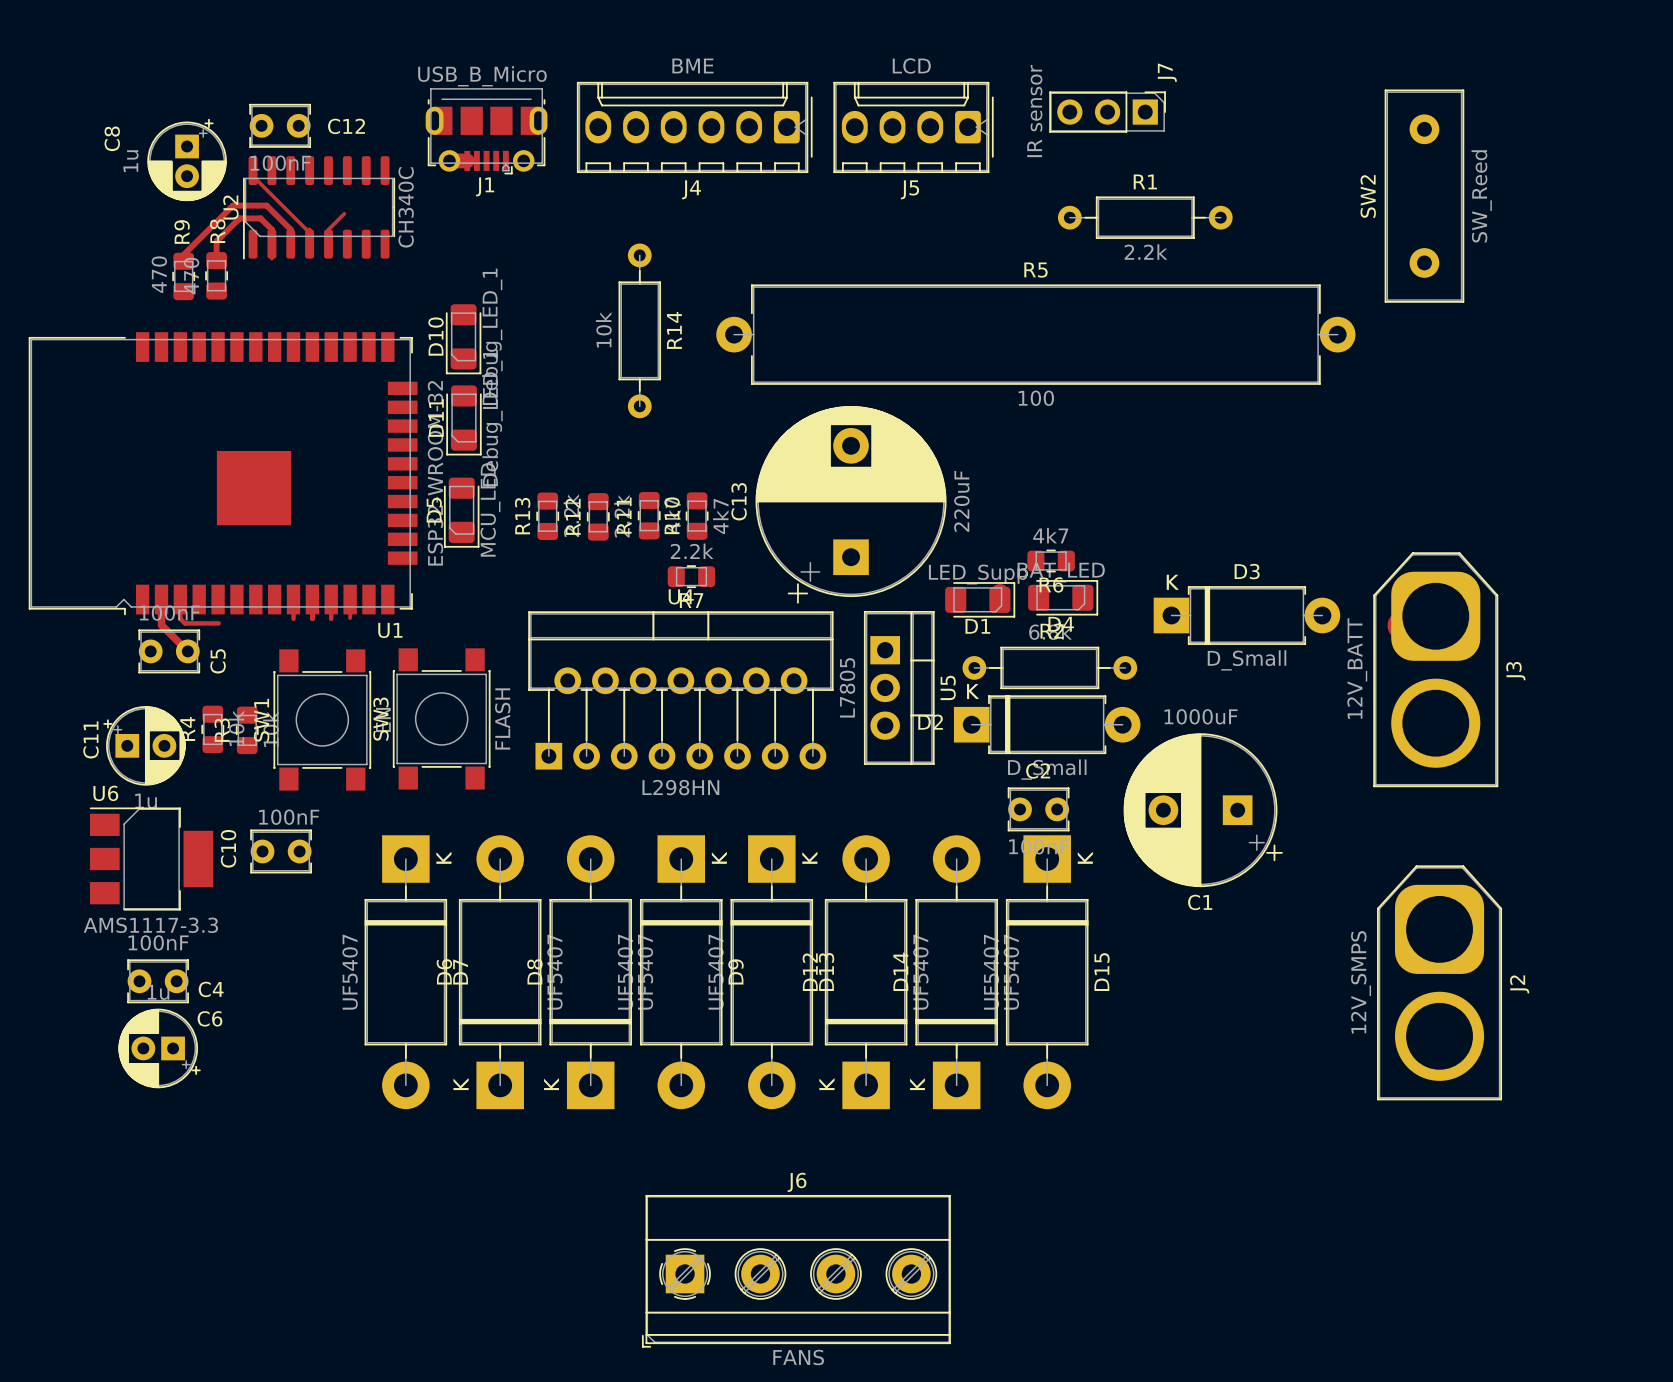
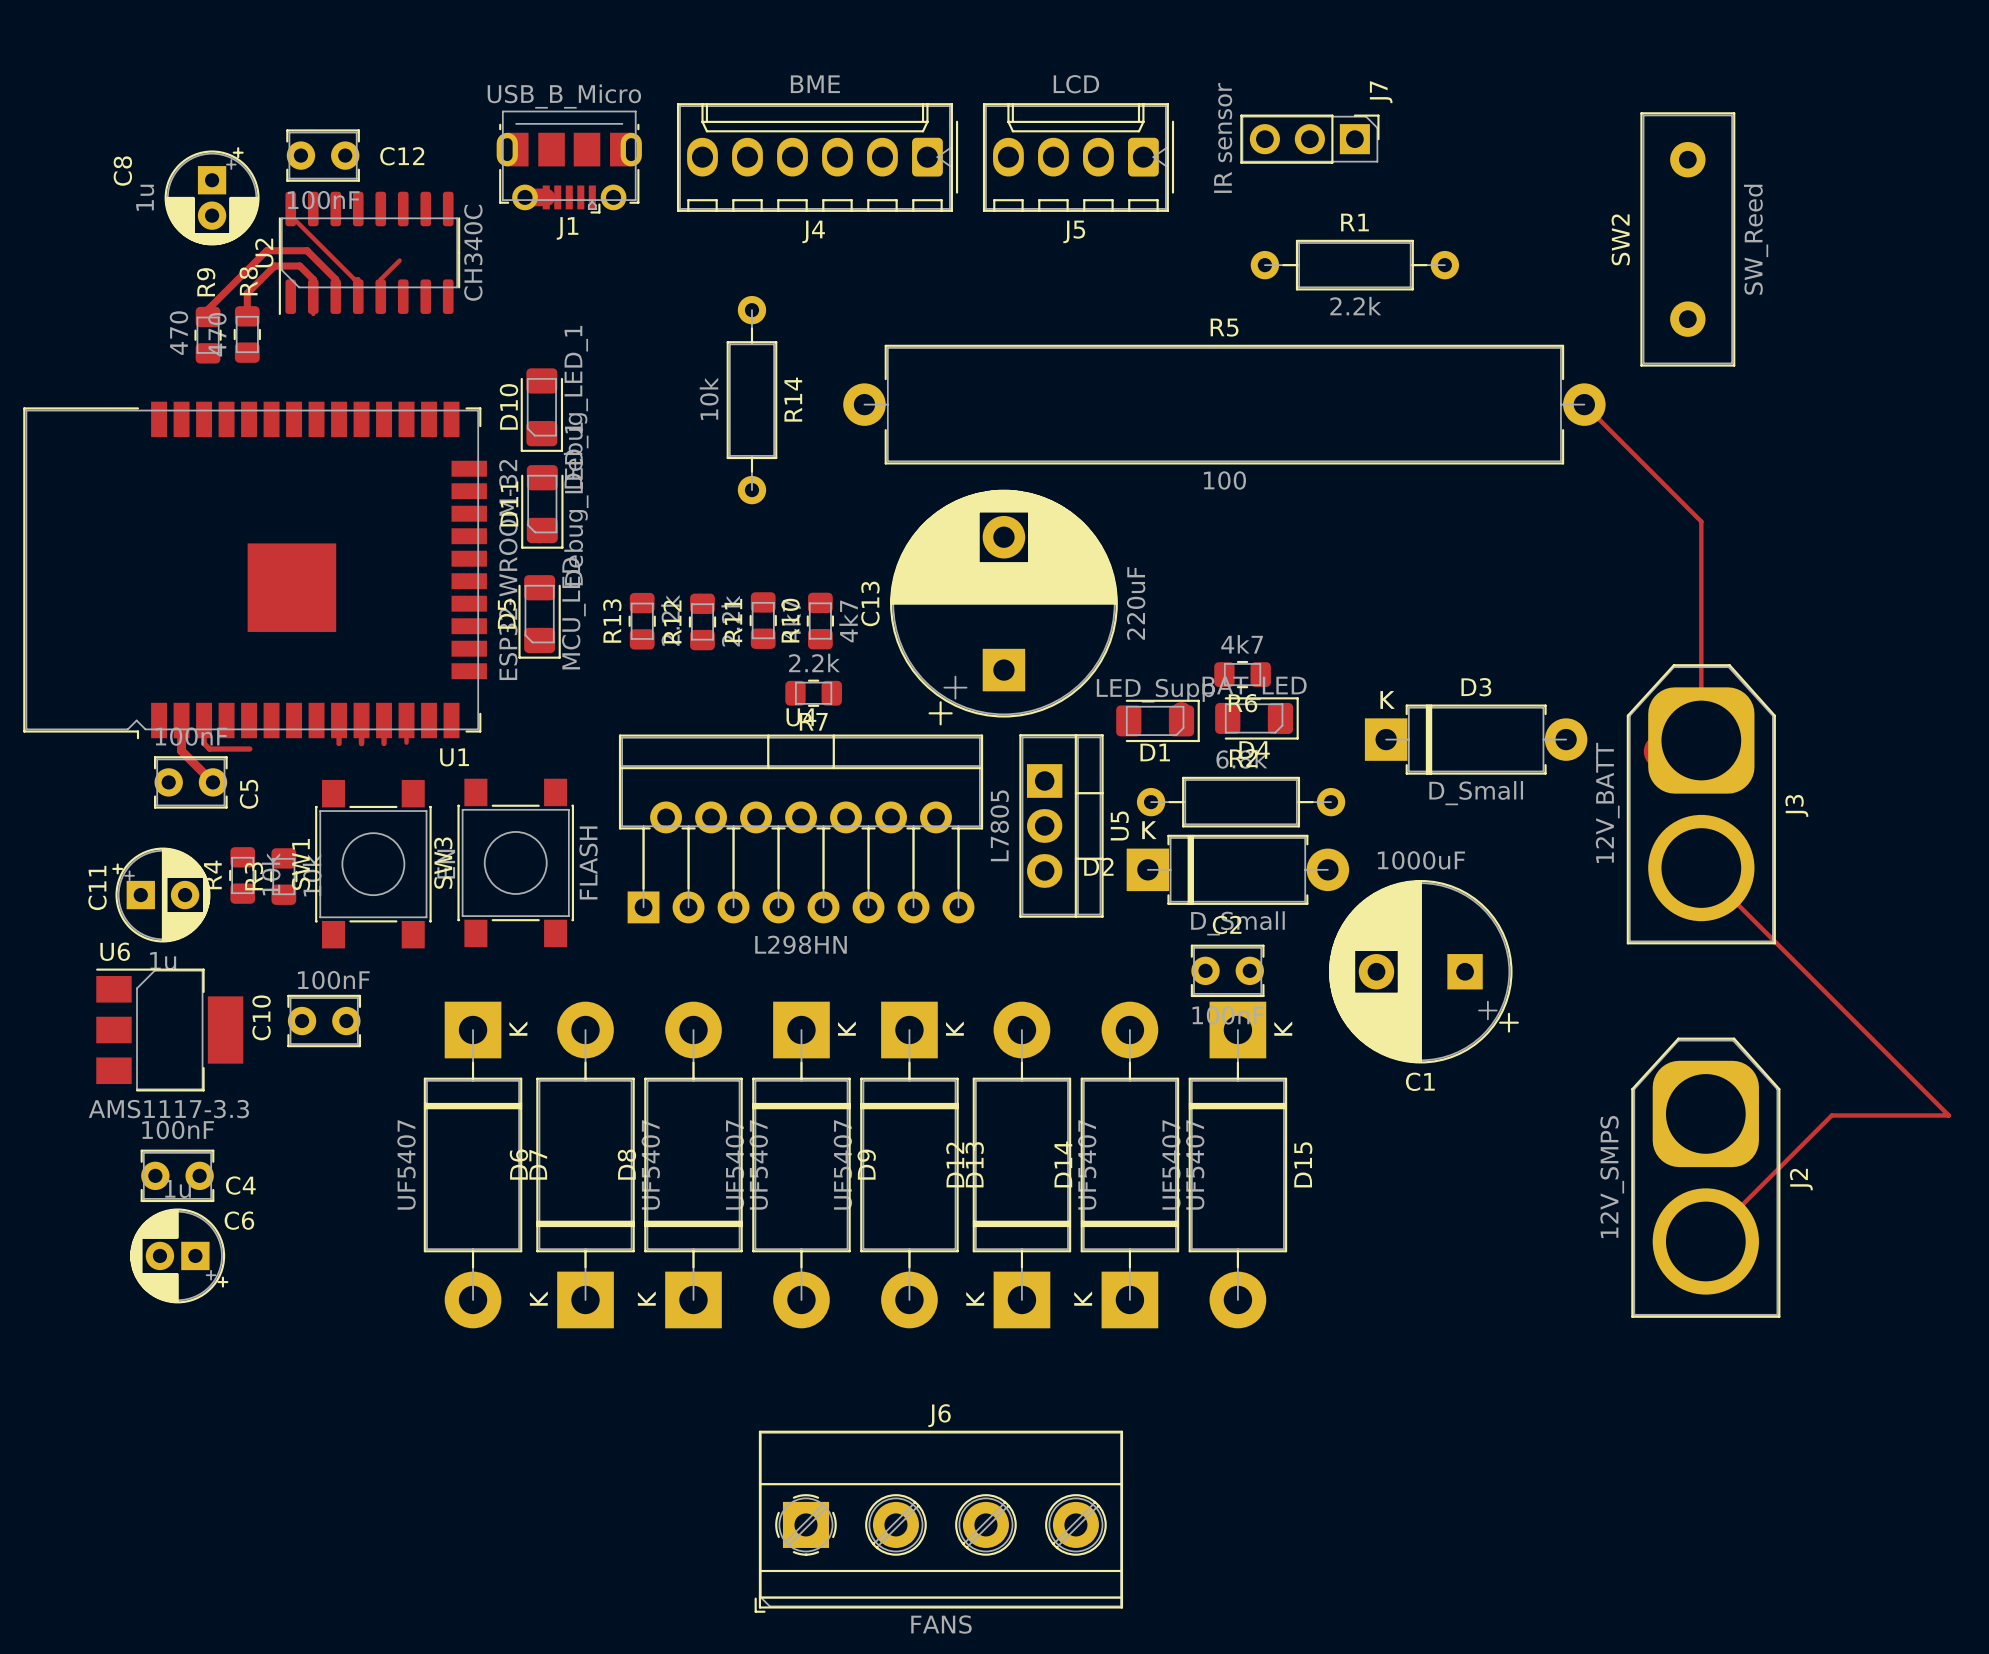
track: none -> (1584, 404) (1701, 521) (1701, 740)
track: none -> (1701, 868) (1948, 1115) (1831, 1115) (1705, 1241)

